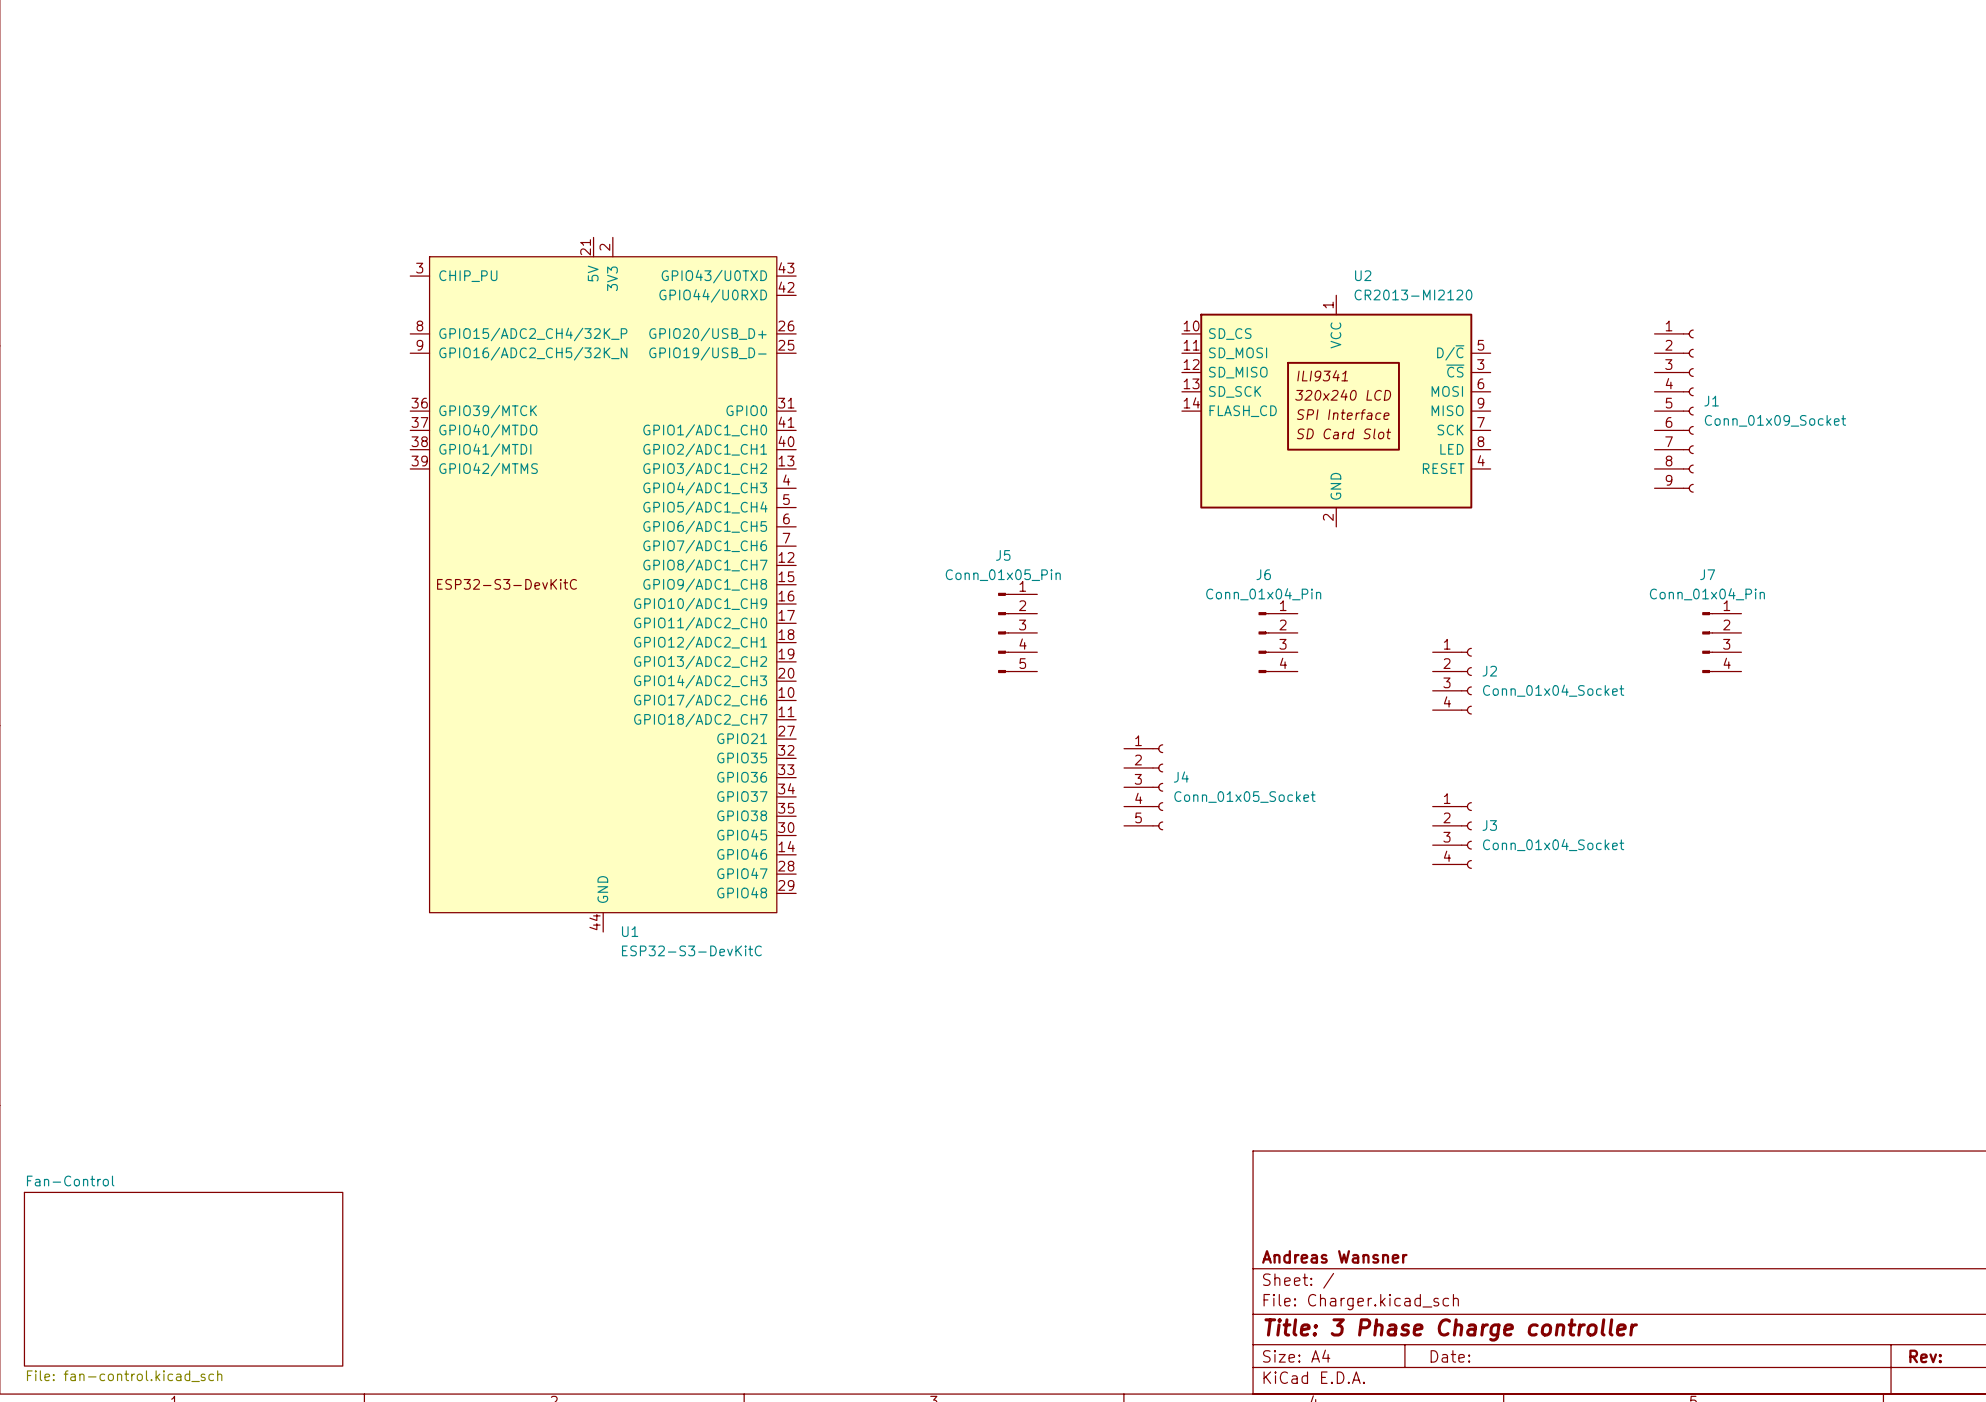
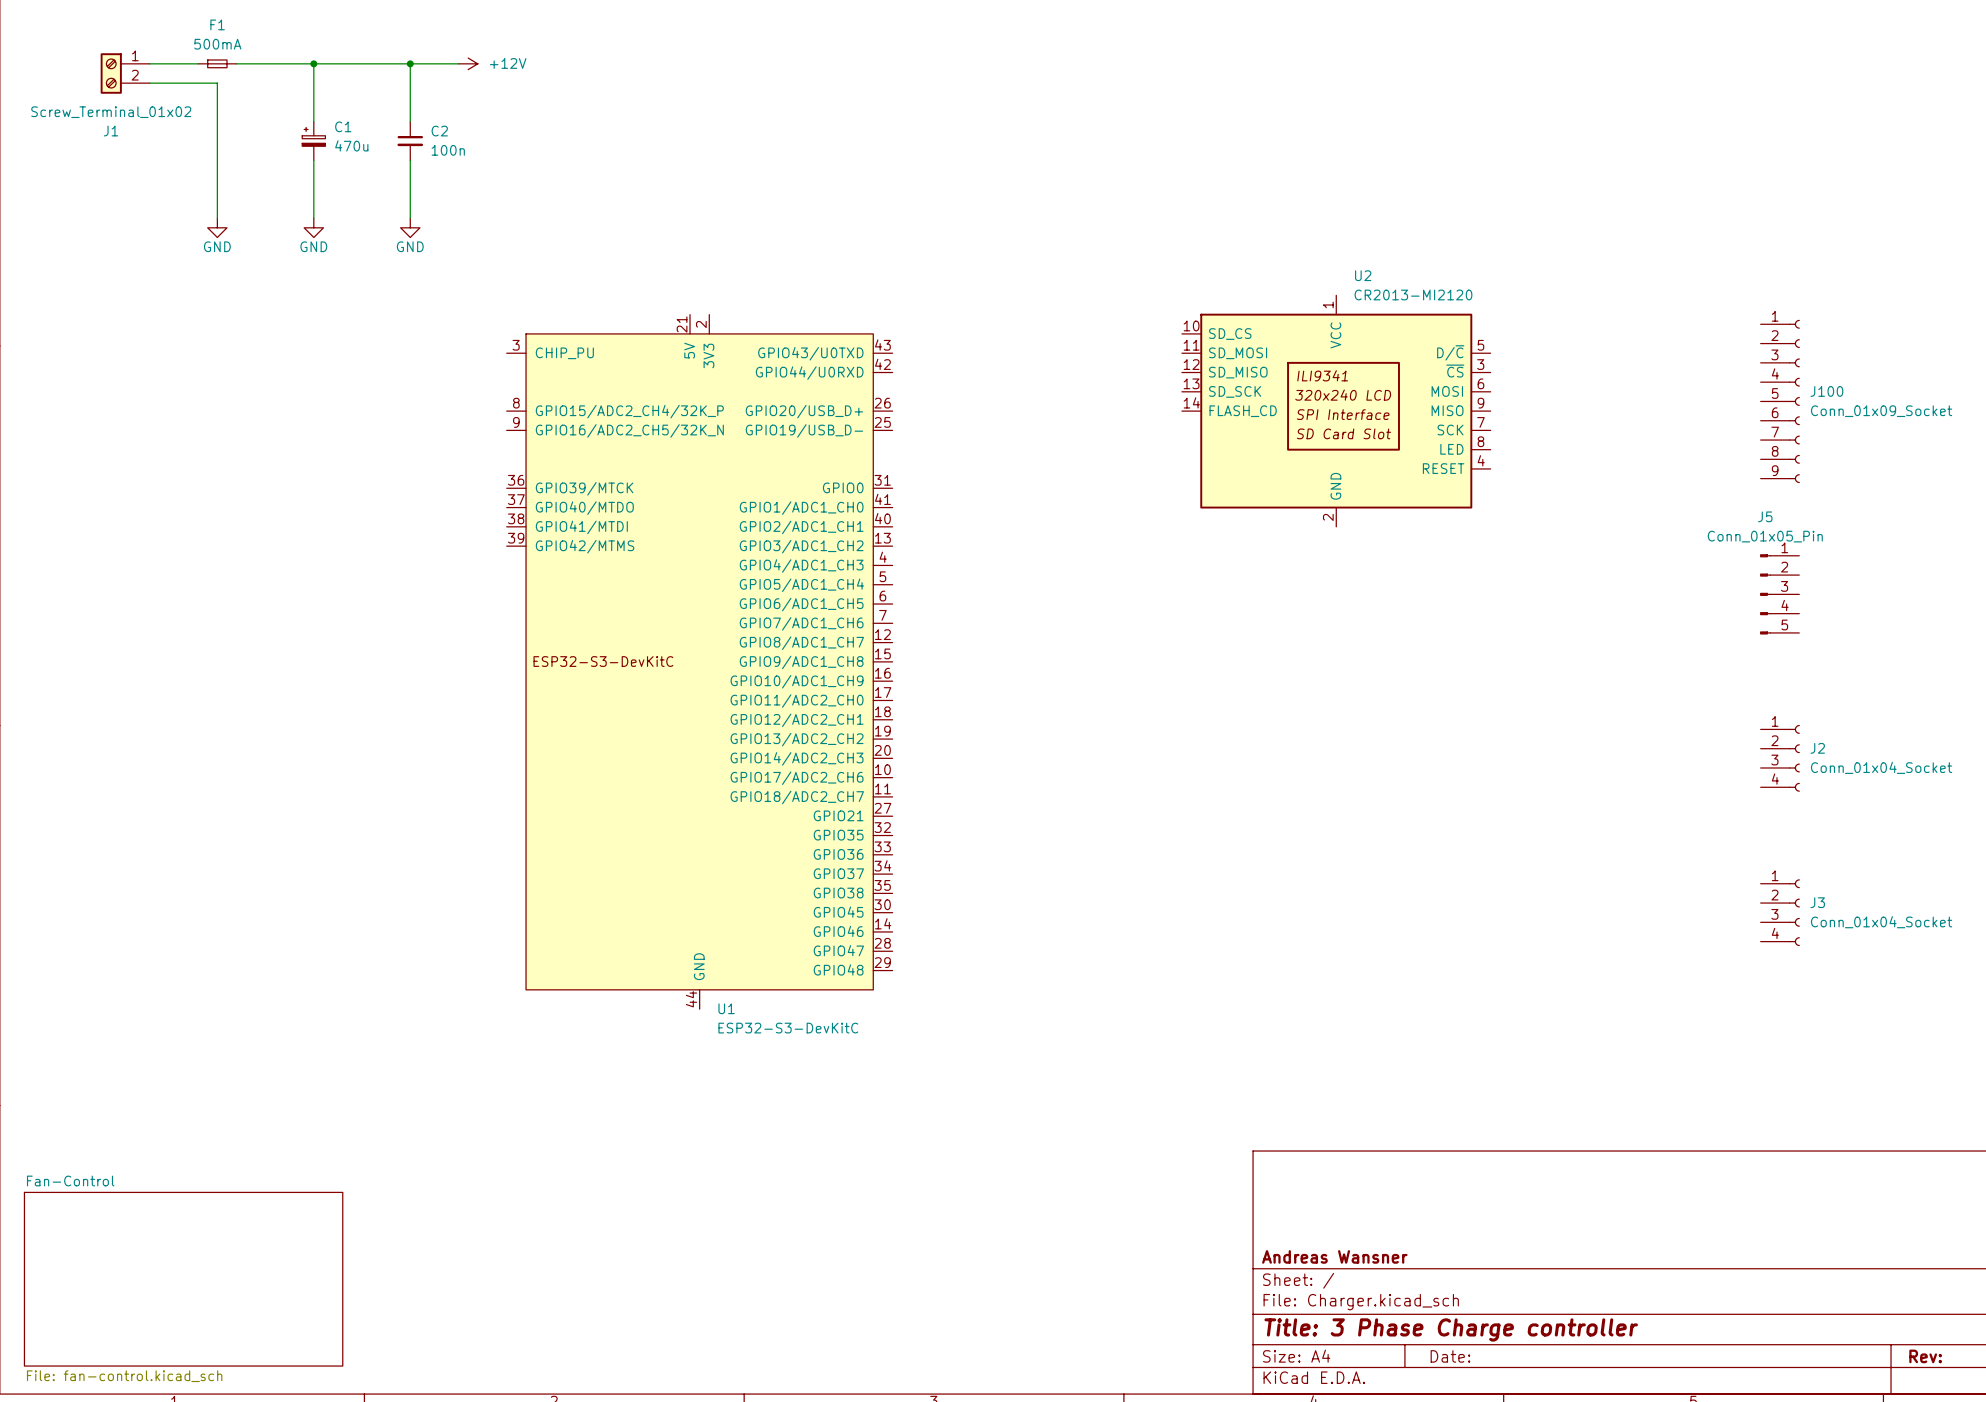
wire: none -> (149, 63) (198, 63)
F1: none -> 500mA (217, 63)
wire: none -> (236, 63) (458, 63)
wire: none -> (313, 63) (313, 121)
junction: none -> (313, 63)
wire: none -> (410, 63) (410, 121)
junction: none -> (410, 63)
power symbol: none -> +12V (468, 63)
wire: none -> (149, 83) (217, 83) (217, 218)
C1: none -> 470u (313, 141)
C2: none -> 100n (410, 141)
wire: none -> (313, 160) (313, 218)
wire: none -> (410, 160) (410, 218)
power symbol: none -> GND (217, 227)
power symbol: none -> GND (313, 227)
power symbol: none -> GND (410, 227)
J1 symbol: [1654, 329, 1694, 493] -> [100, 53, 150, 94]
J1 name position: J1 (1711, 401) -> J1 (111, 131)
J100: none -> Conn_01x09_Socket (1780, 401)
J1 value: Conn_01x09_Socket (1775, 420) -> Screw_Terminal_01x02 (111, 112)
U1 position: (603, 584) -> (699, 661)
J5 position: (1017, 632) -> (1779, 594)
J6: Conn_01x04_Pin (1278, 642) -> none
J7: Conn_01x04_Pin (1721, 642) -> none
J2 position: (1452, 681) -> (1780, 758)
J4: Conn_01x05_Socket (1143, 787) -> none
J3 position: (1452, 835) -> (1780, 912)

